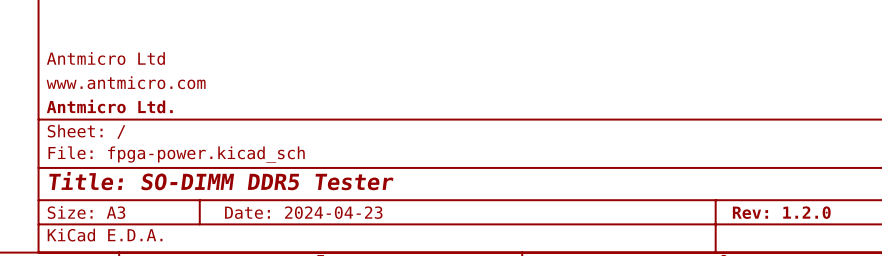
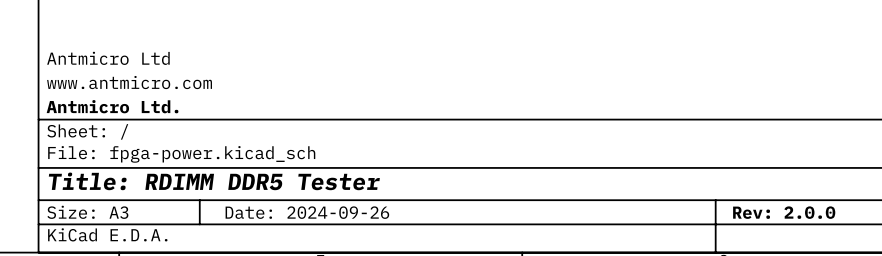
title block: Title: SO-DIMM DDR5 Tester (221, 181) -> Title: RDIMM DDR5 Tester (214, 181)
title block: Date: 2024-04-23 (303, 212) -> Date: 2024-09-26 (307, 212)
title block: Rev: 1.2.0 (781, 212) -> Rev: 2.0.0 (784, 212)

